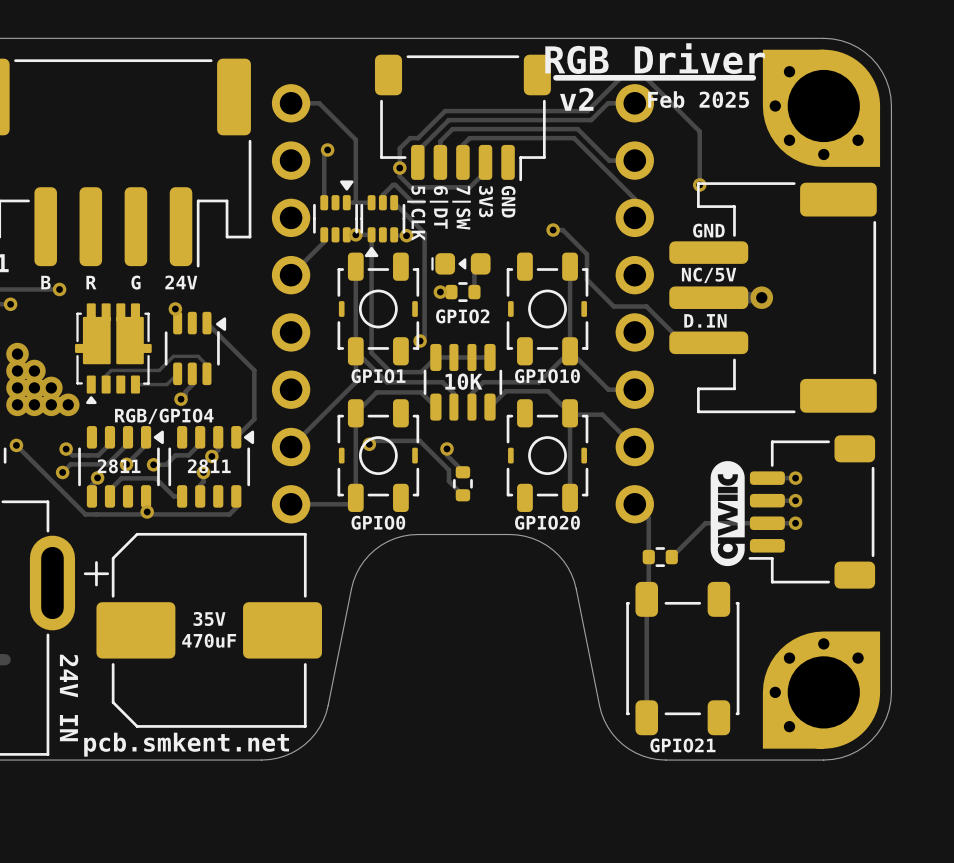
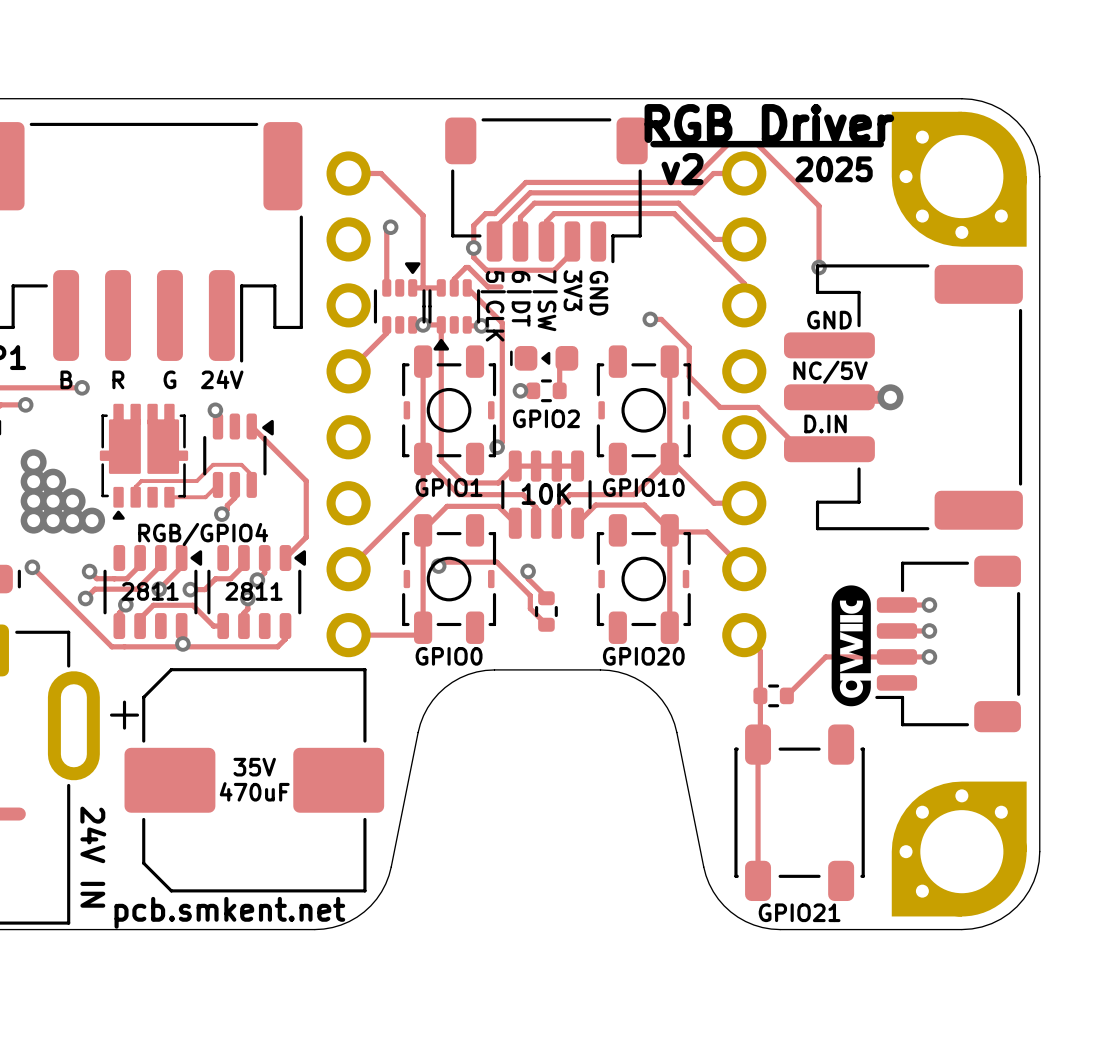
text: Feb 2025 (698, 99) -> 2025 (834, 169)

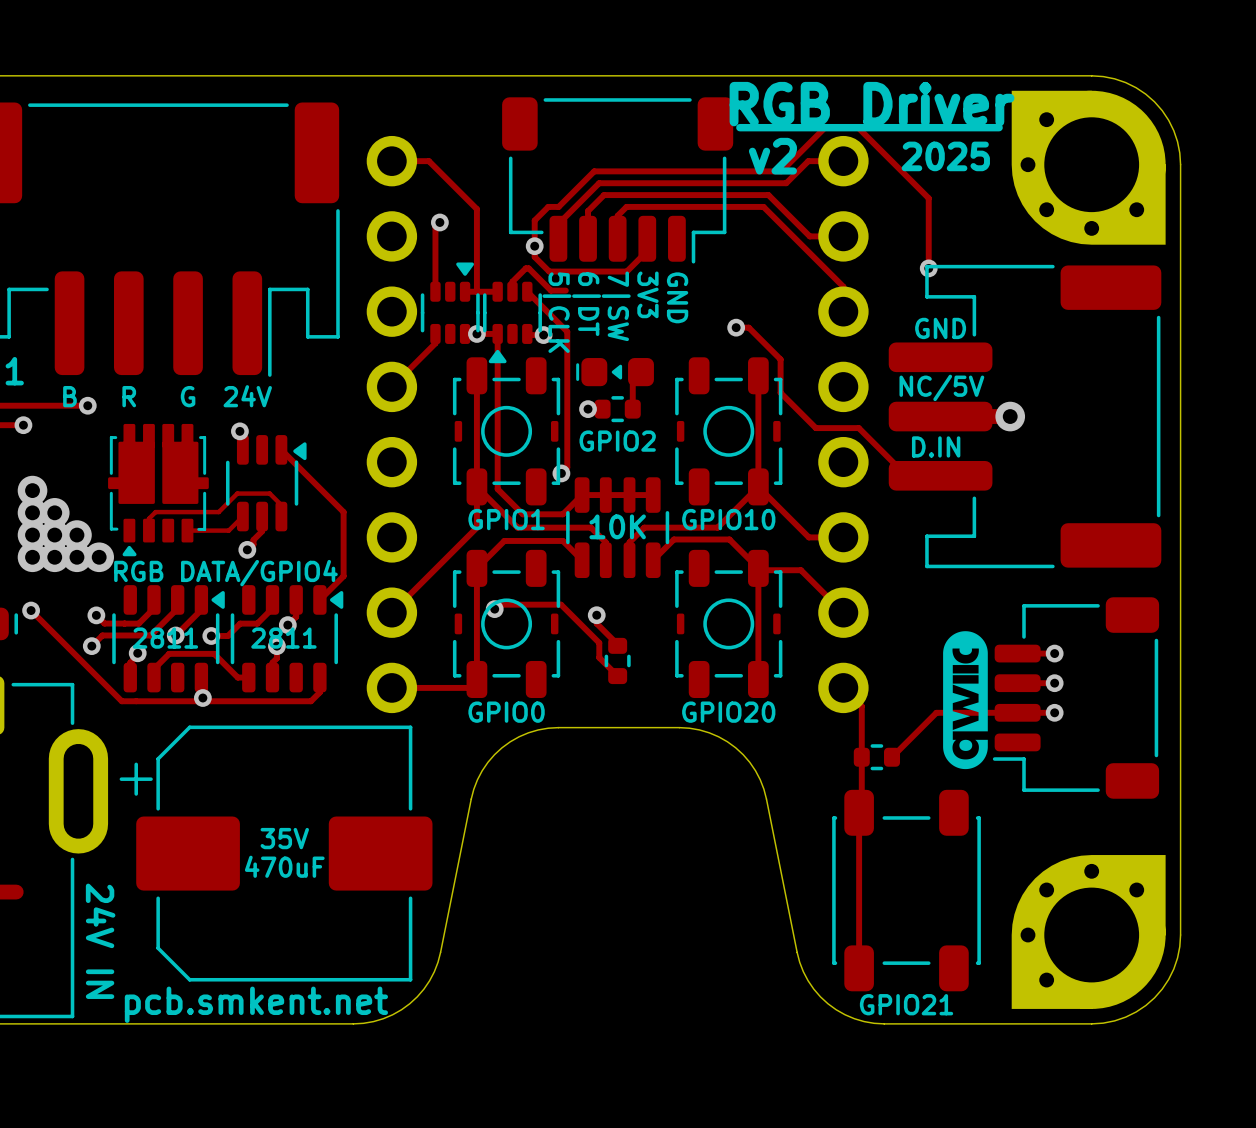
text: RGB/GPIO4 (203, 534) -> RGB DATA/GPIO4 (225, 573)

